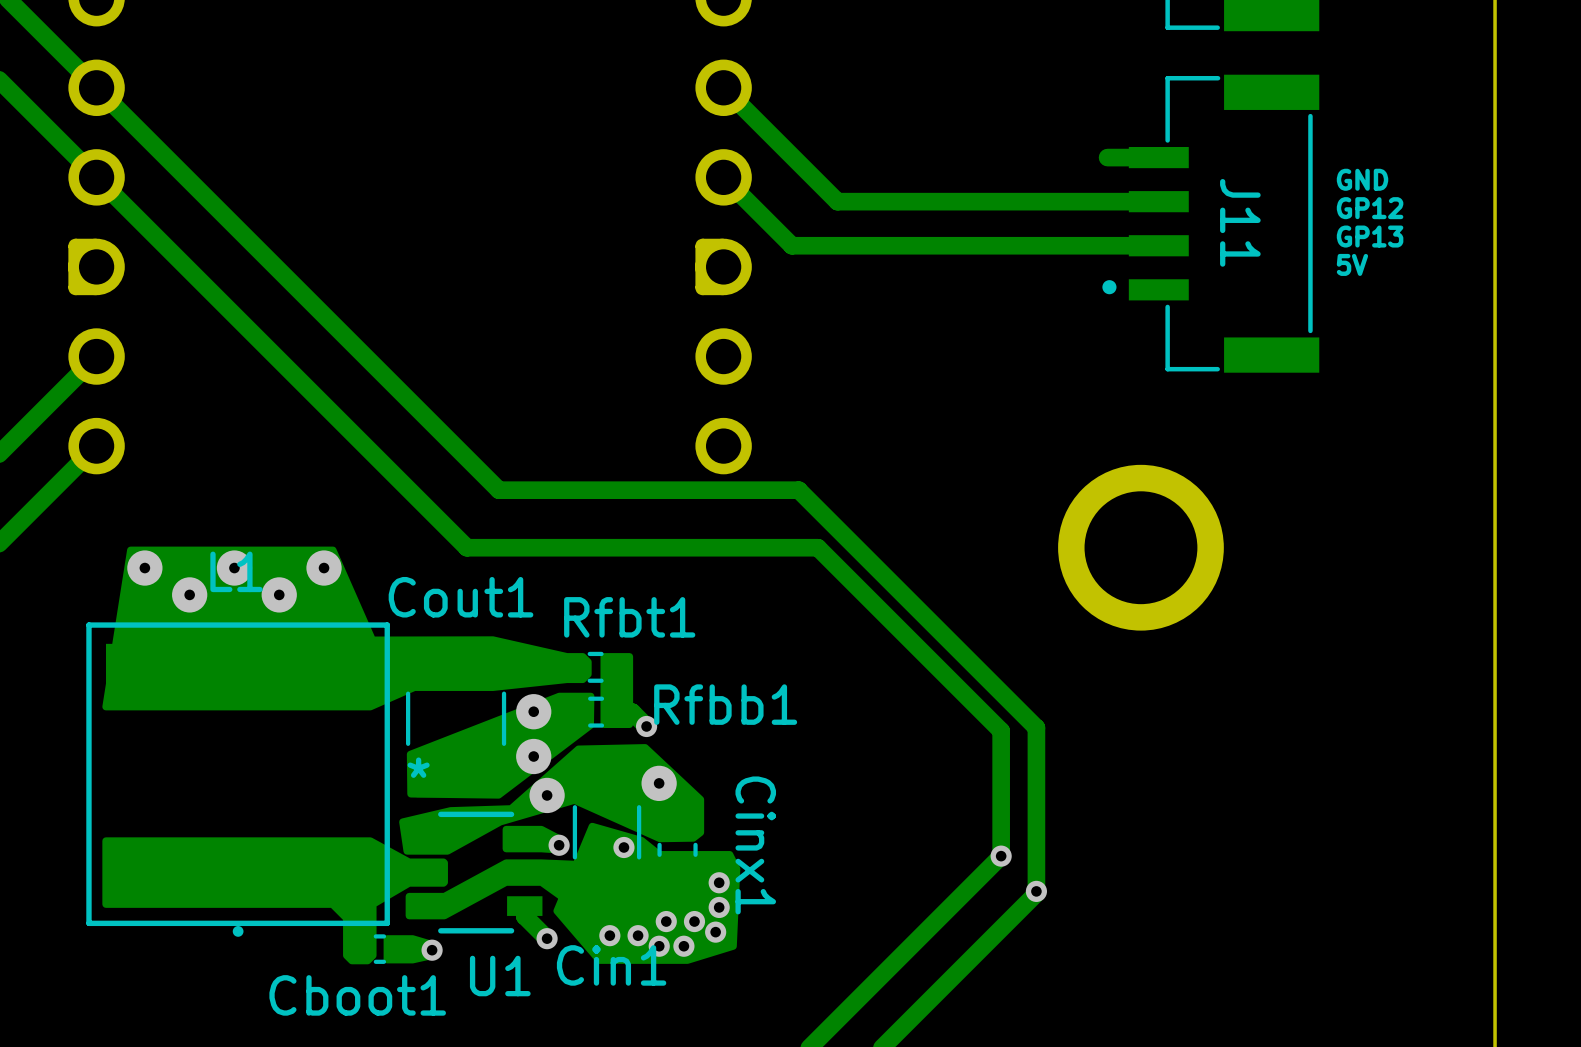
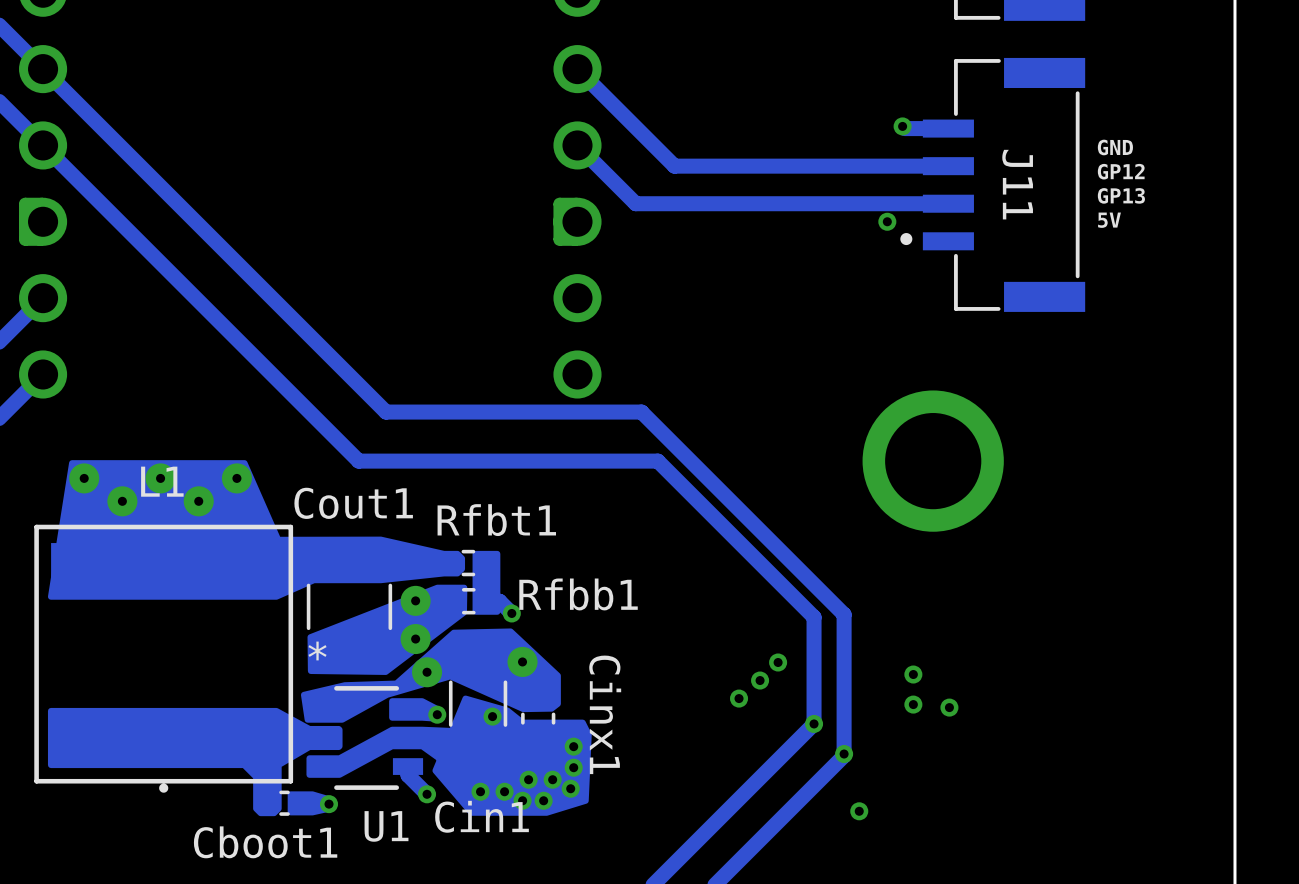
via: none -> (902, 126)
via: none -> (887, 221)
via: none -> (778, 662)
via: none -> (913, 674)
via: none -> (760, 680)
via: none -> (739, 698)
via: none -> (913, 704)
via: none -> (949, 707)
via: none -> (859, 811)

